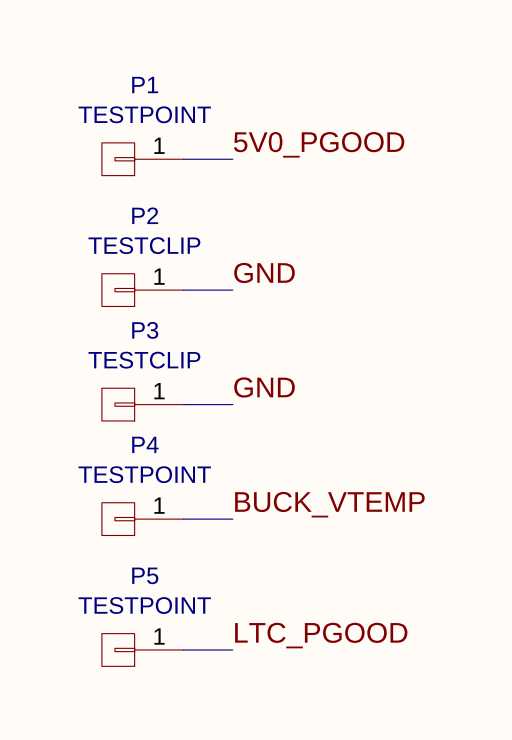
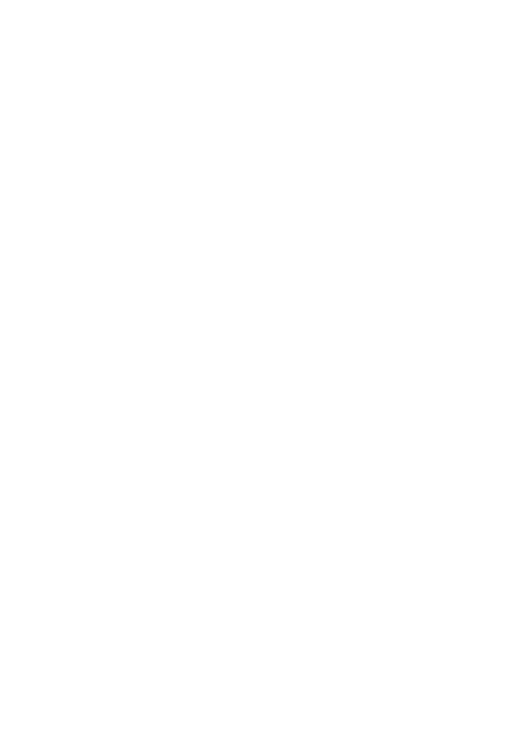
label: 5V0_PGOOD (319, 144) -> none
P1: TESTPOINT (142, 159) -> none
wire: (183, 159) (232, 159) -> none
label: GND (264, 272) -> none
P2: TESTCLIP (142, 290) -> none
wire: (183, 290) (232, 290) -> none
label: GND (264, 387) -> none
P3: TESTCLIP (142, 404) -> none
wire: (183, 404) (232, 404) -> none
label: BUCK_VTEMP (329, 504) -> none
P4: TESTPOINT (142, 519) -> none
wire: (183, 519) (232, 519) -> none
label: LTC_PGOOD (321, 635) -> none
P5: TESTPOINT (142, 649) -> none
wire: (183, 649) (232, 649) -> none

